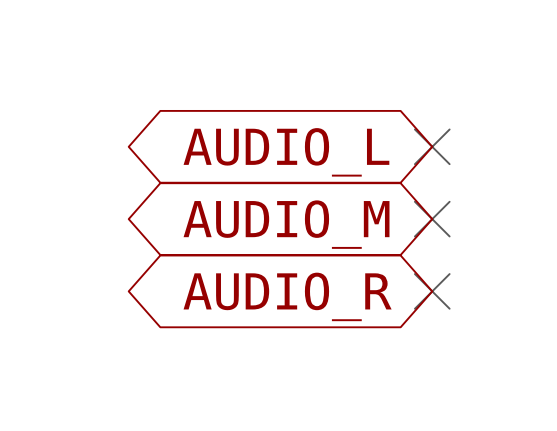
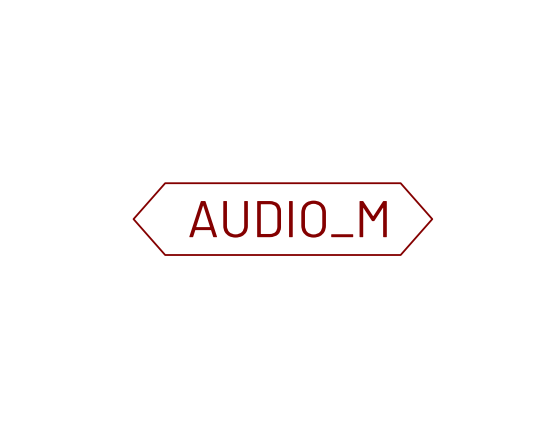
no-connect mark: (432, 146) -> none
global label: AUDIO_L (286, 152) -> none
no-connect mark: (432, 219) -> none
no-connect mark: (432, 291) -> none
global label: AUDIO_R (287, 296) -> none

